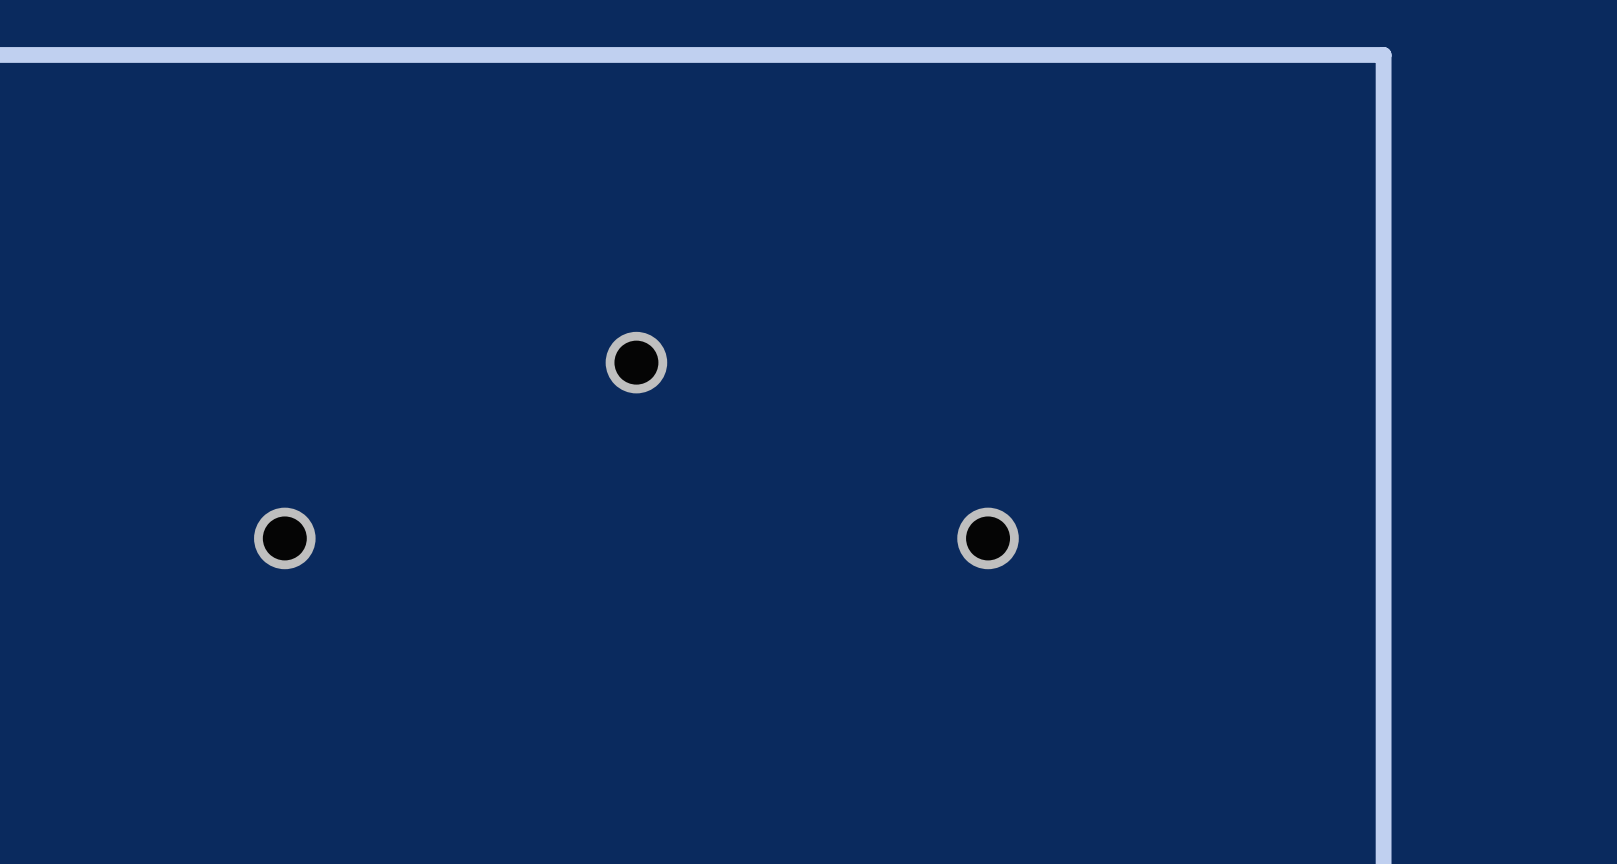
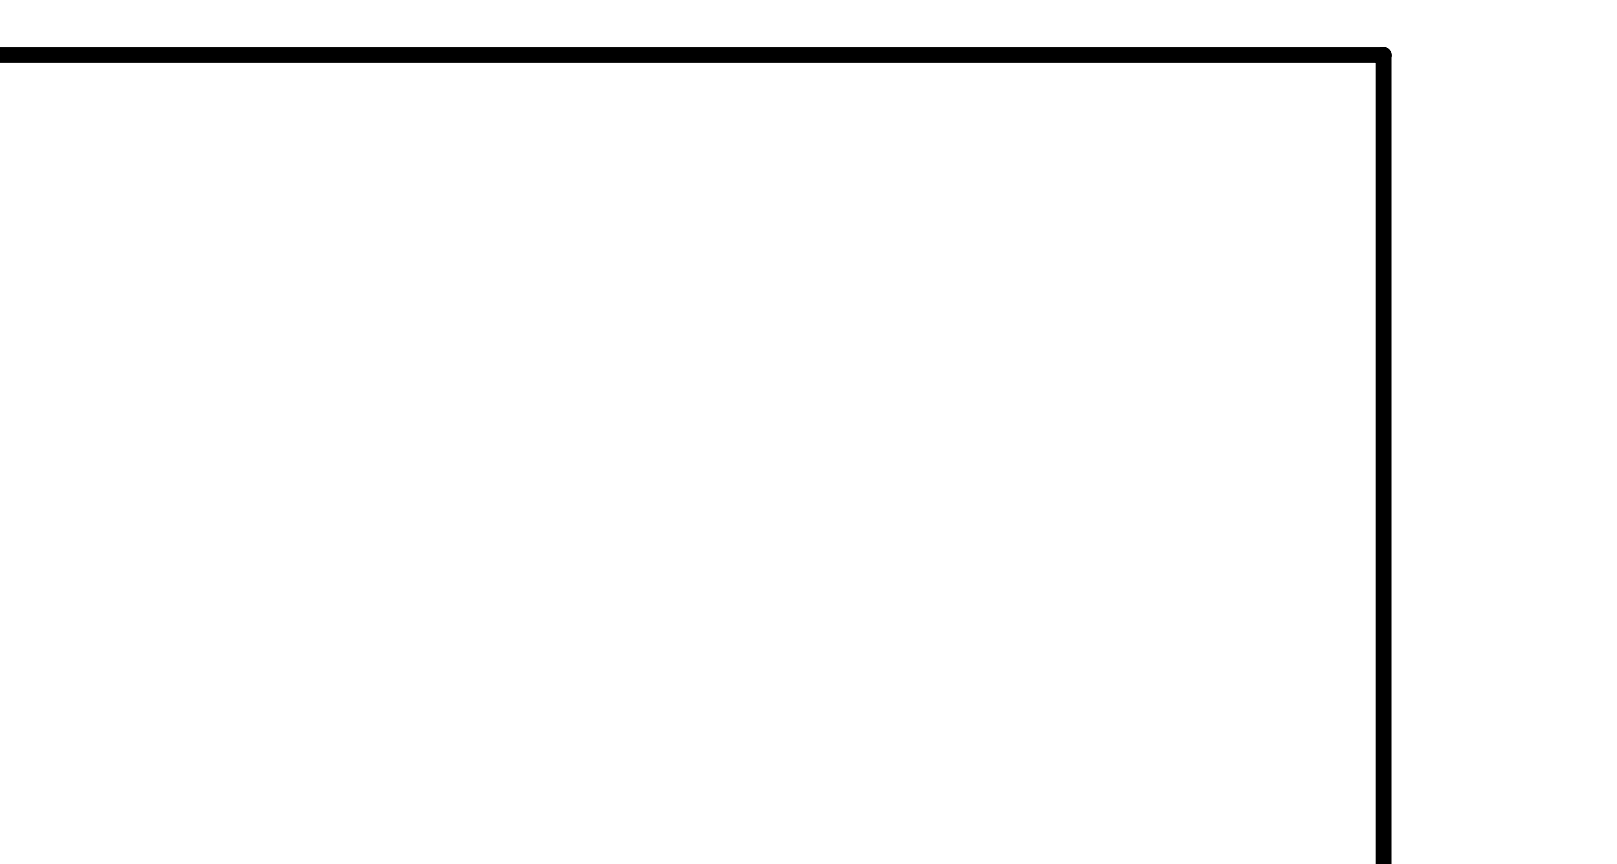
via: (636, 362) -> none
via: (284, 538) -> none
via: (988, 538) -> none

